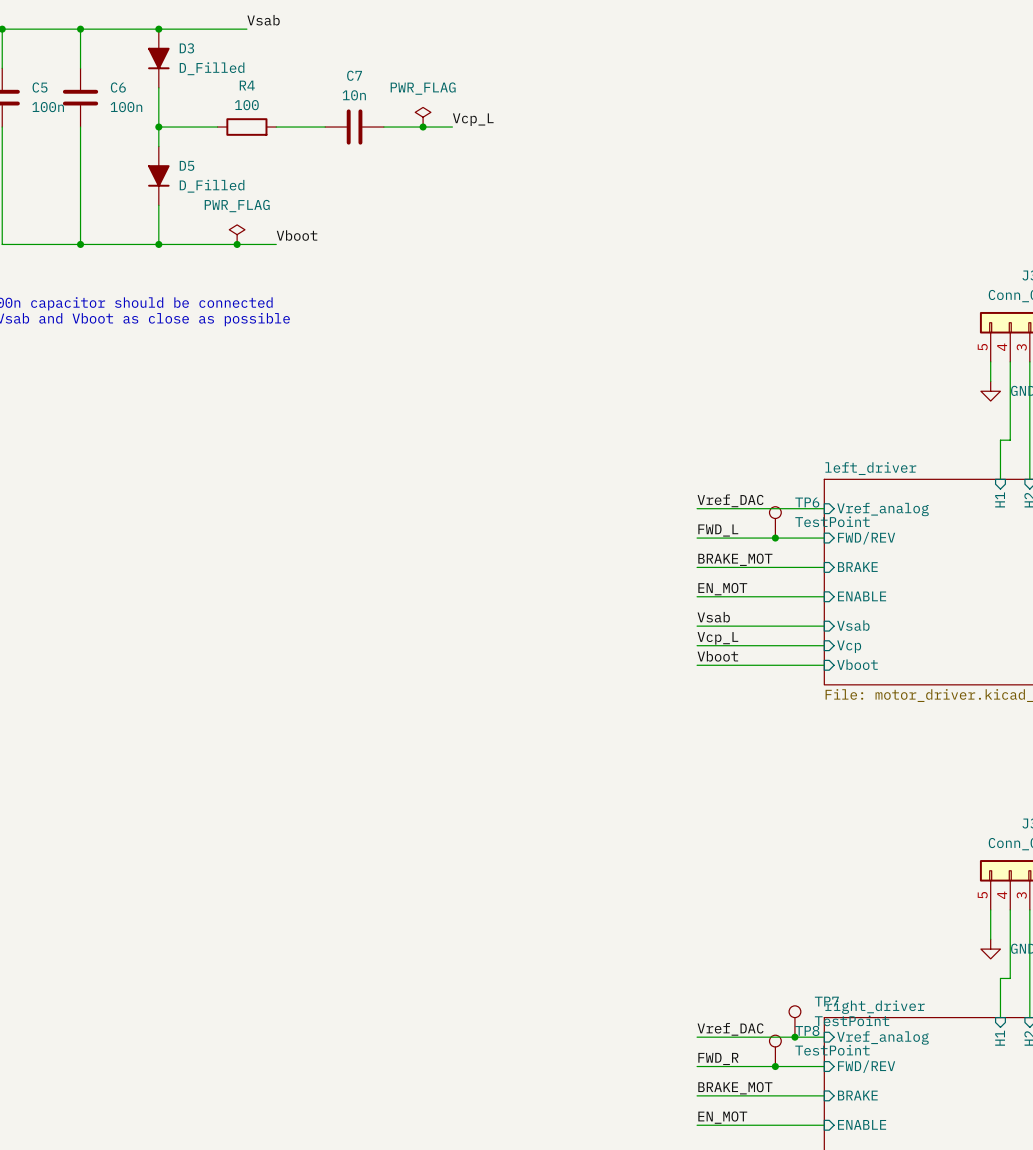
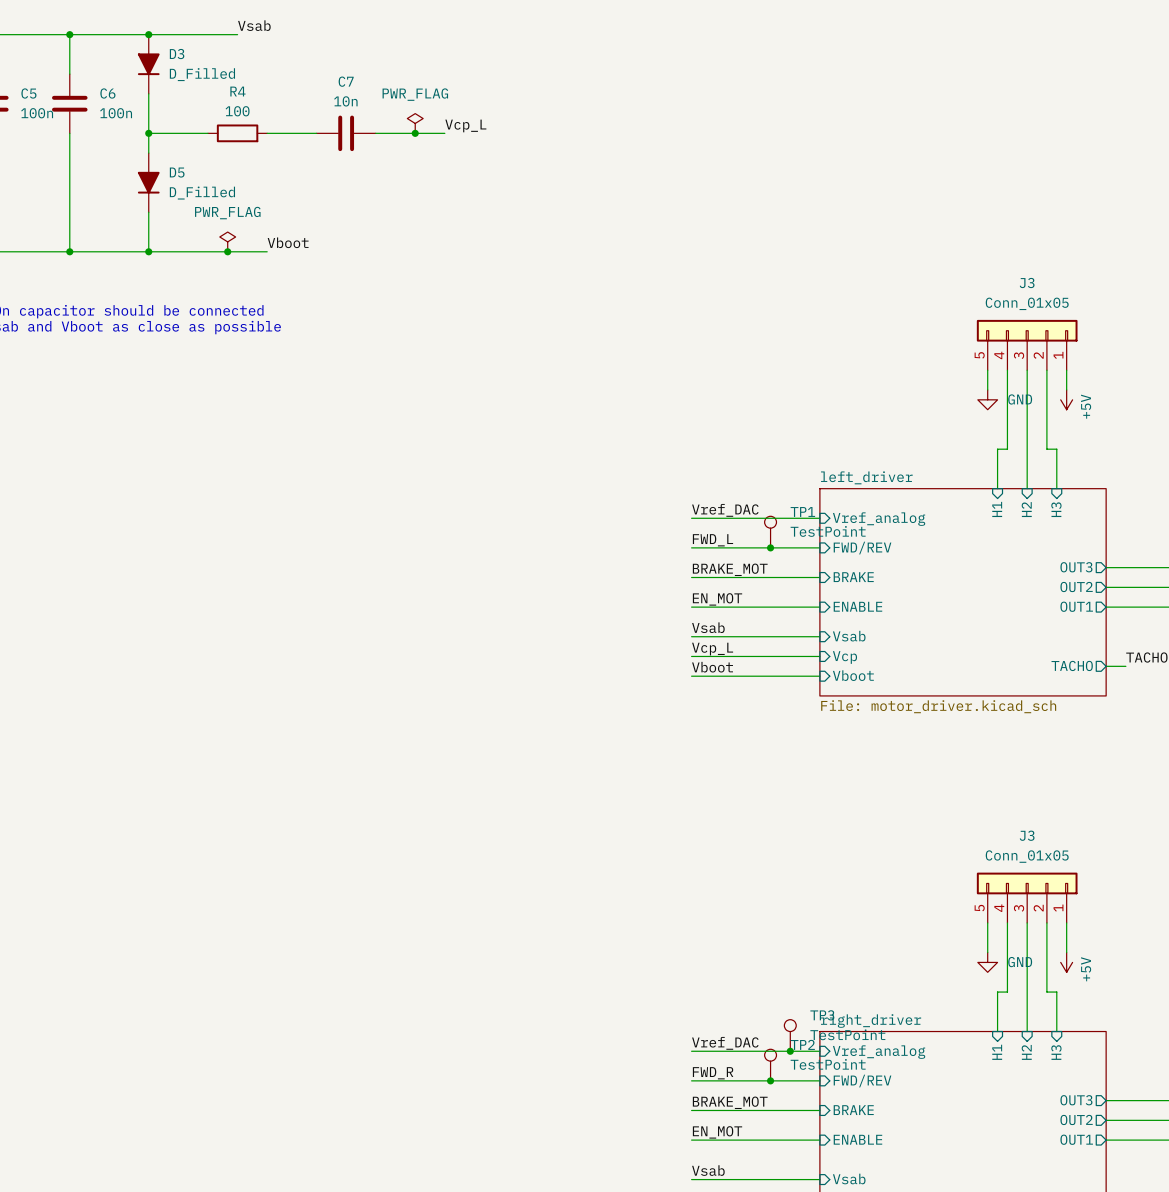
TP6 name: TP6 (807, 502) -> TP1 (802, 511)
TP7 name: TP7 (826, 1001) -> TP3 (822, 1015)
TP8 name: TP8 (807, 1030) -> TP2 (802, 1044)

